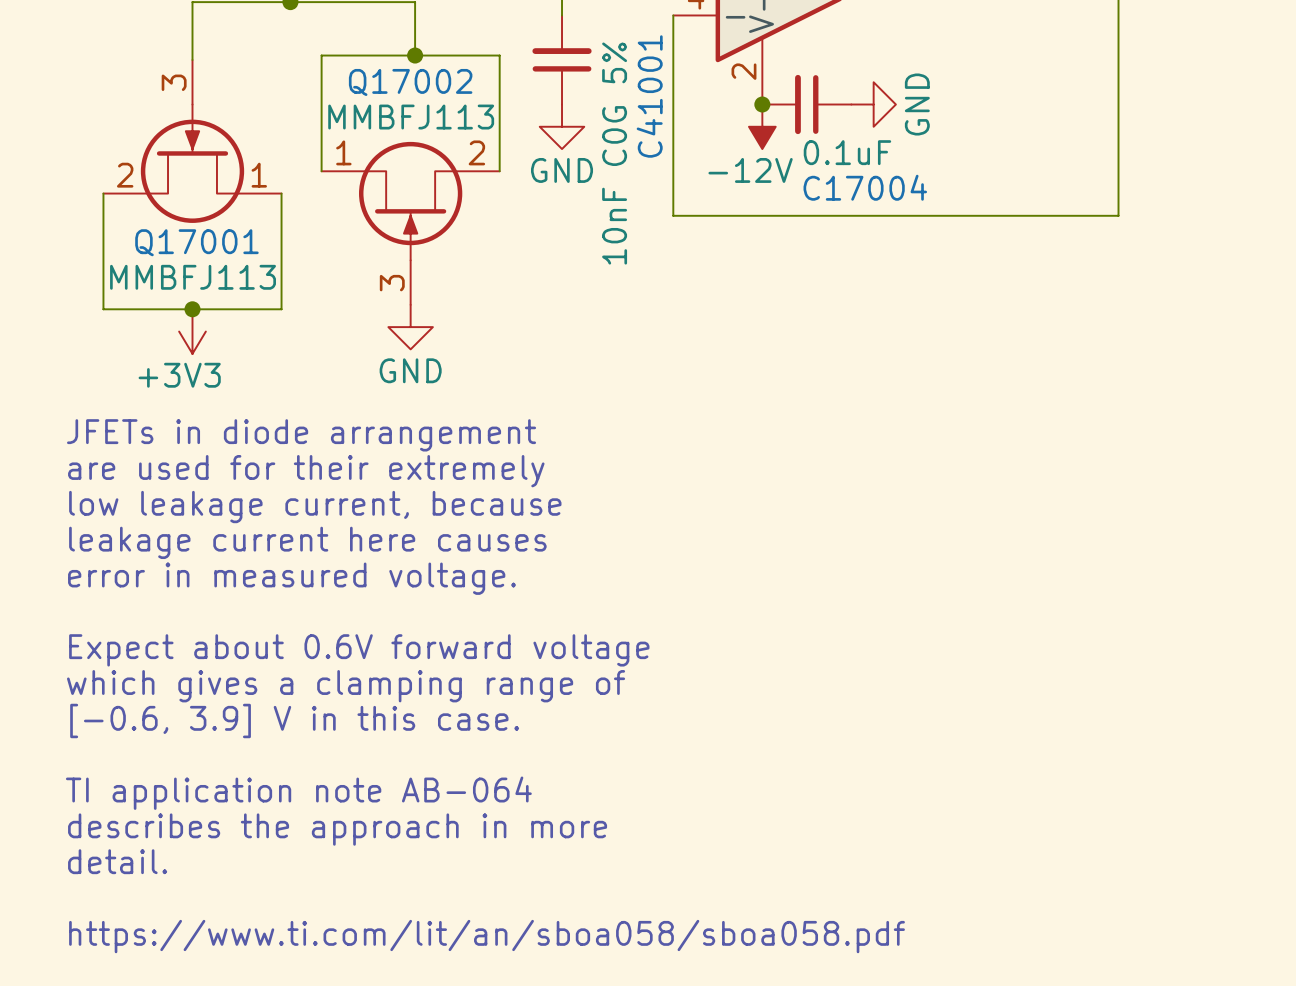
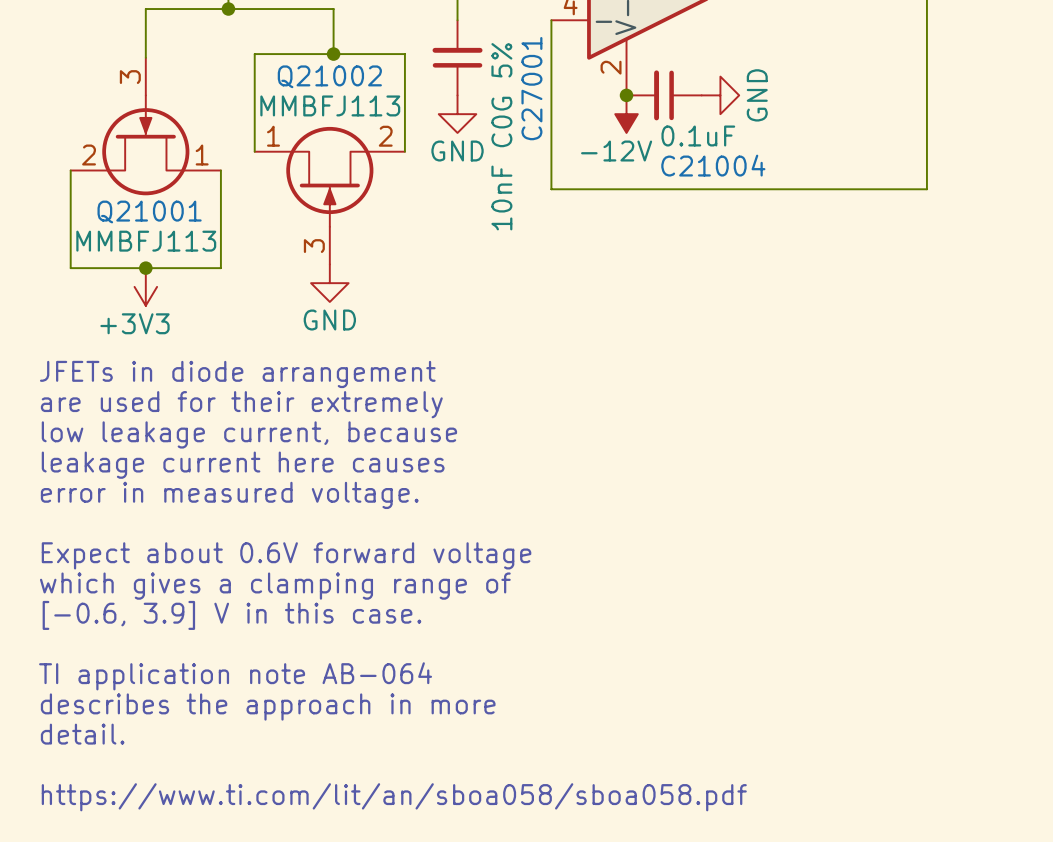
Q17002 name: Q17002 (410, 82) -> Q21002 (329, 76)
C41001 name: C41001 (649, 96) -> C27001 (531, 88)
C17004 name: C17004 (865, 187) -> C21004 (713, 165)
Q17001 name: Q17001 (196, 242) -> Q21001 (149, 212)

